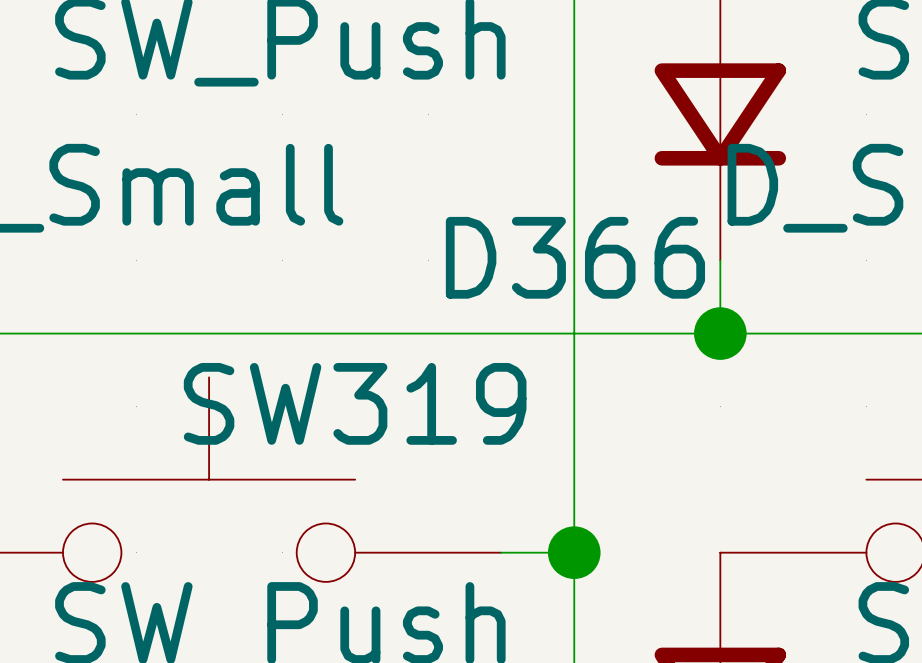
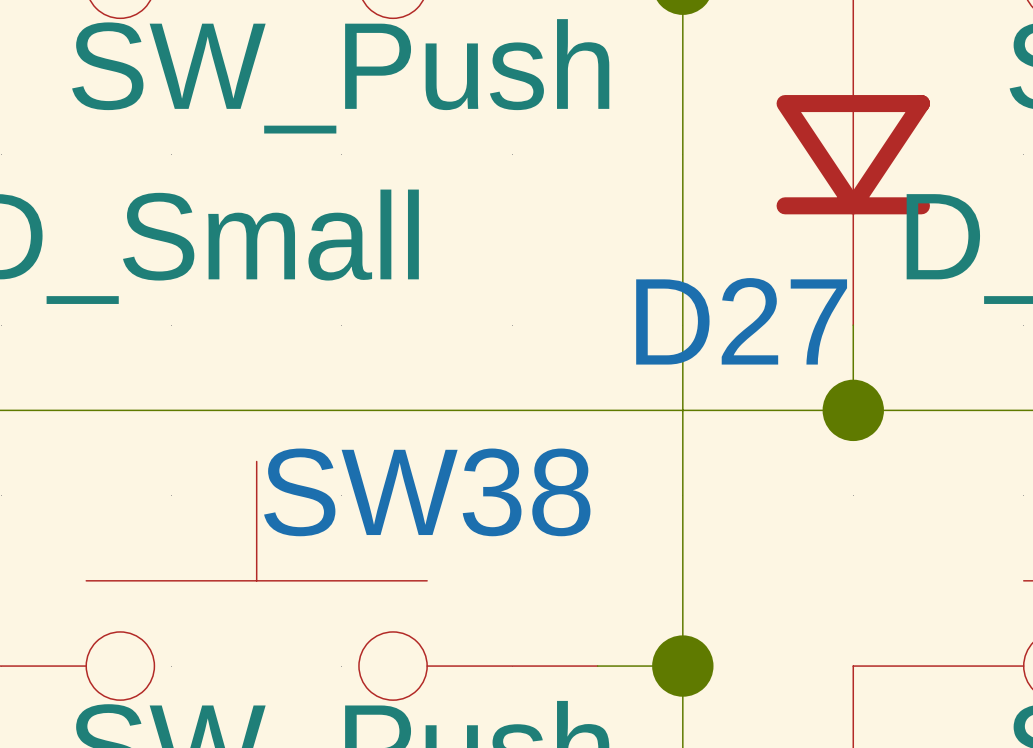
D366 name: D366 (575, 257) -> D27 (741, 321)
SW319 name: SW319 (355, 403) -> SW38 (427, 492)

